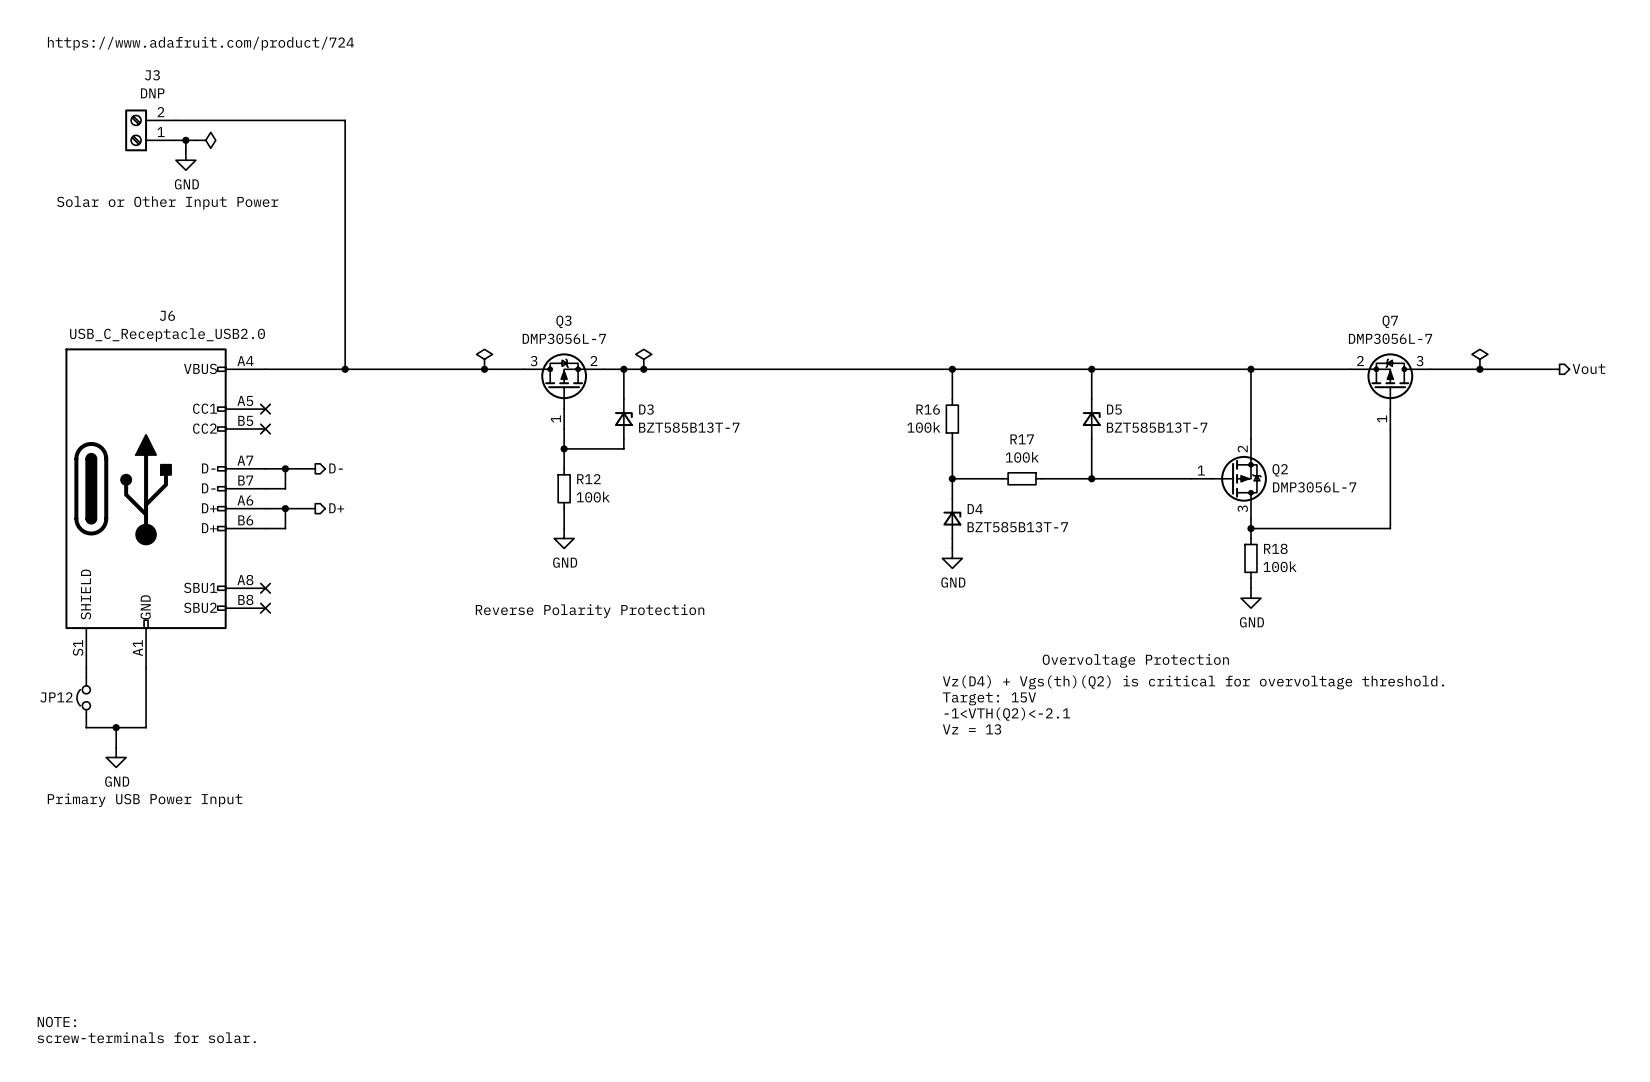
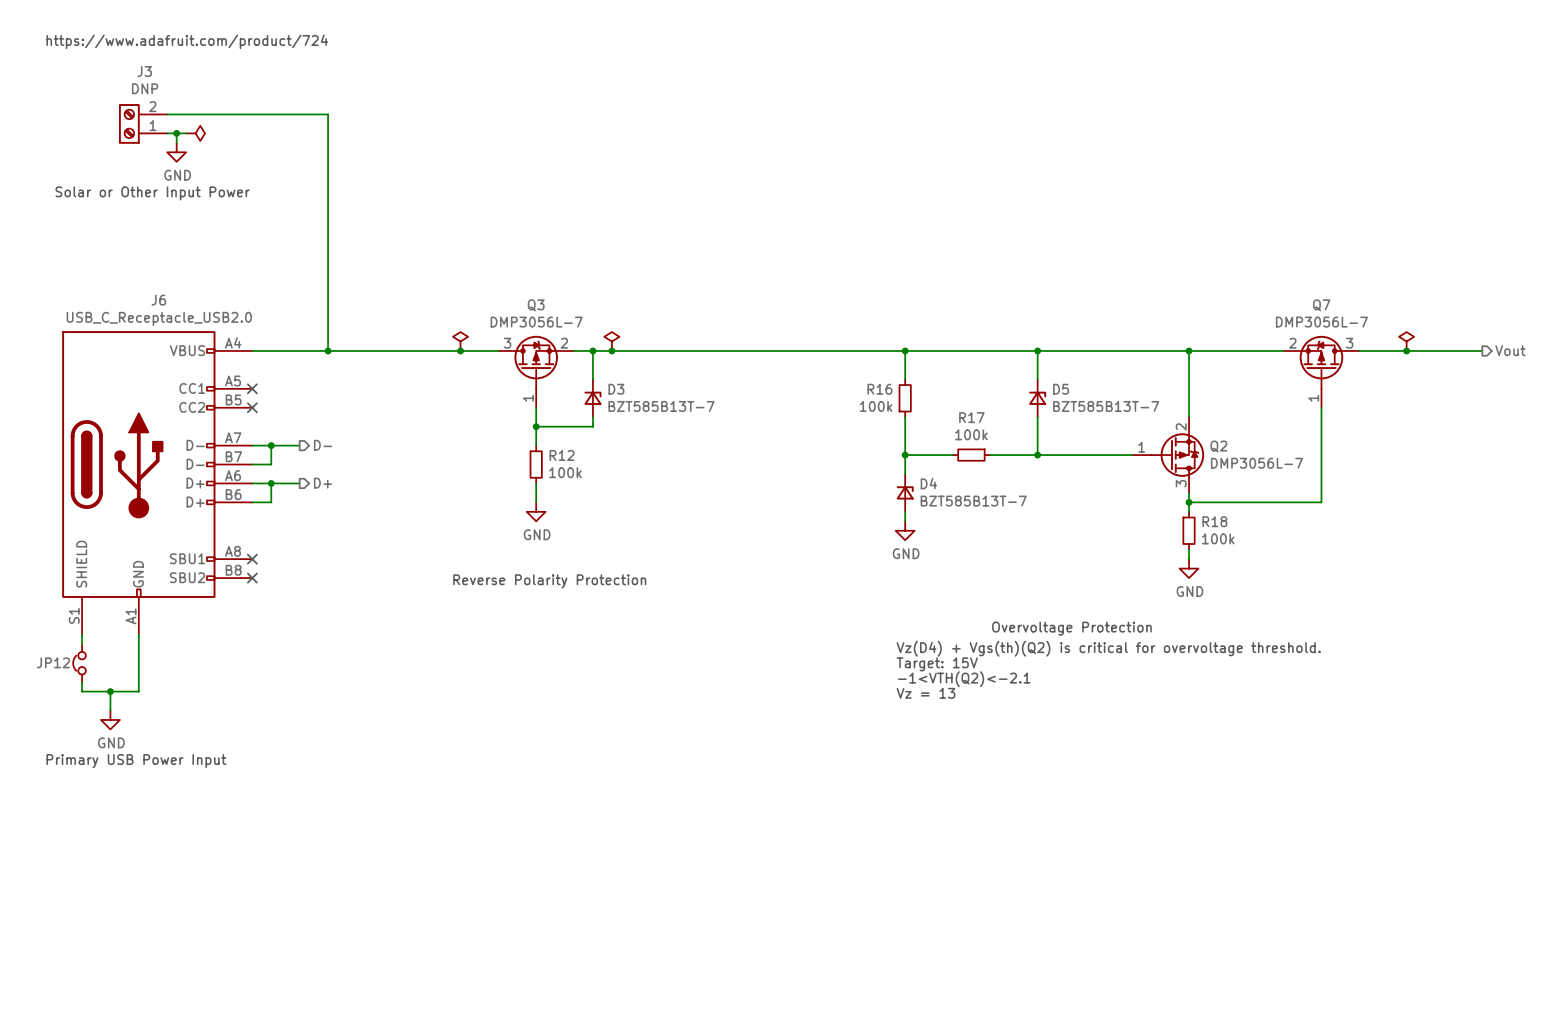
text: NOTE: (56, 1021) -> none
text: screw-terminals for solar. (146, 1037) -> none

